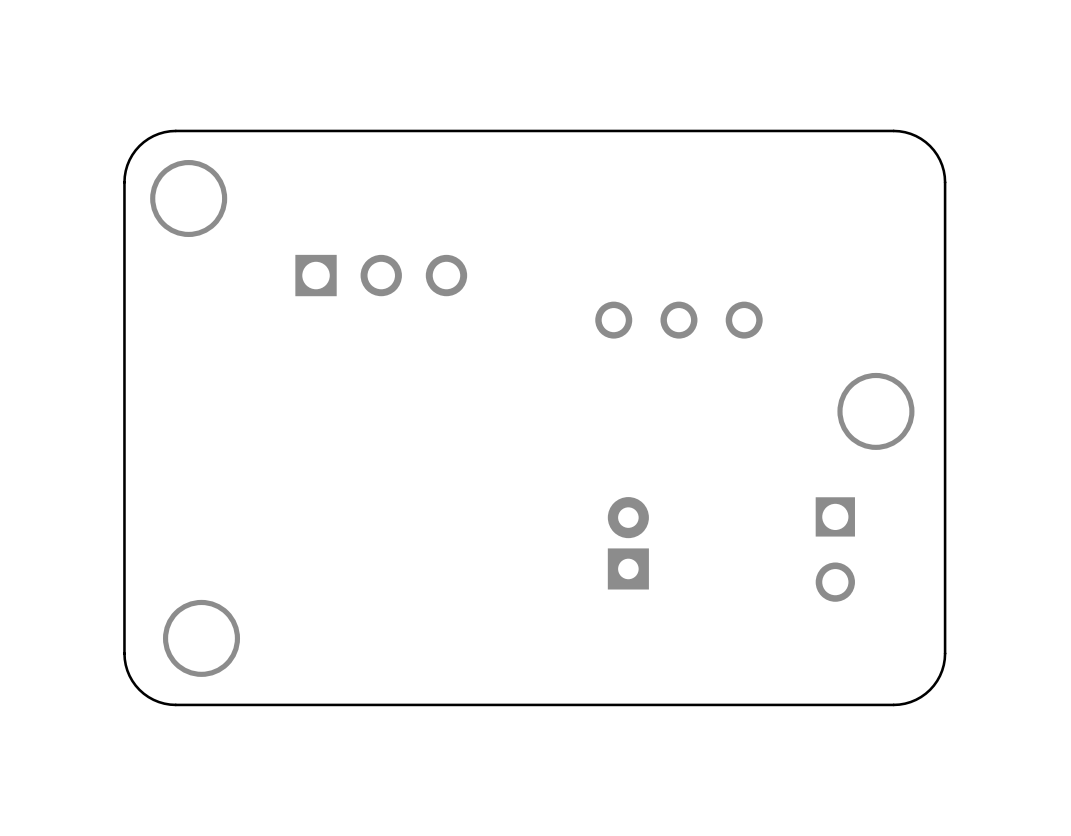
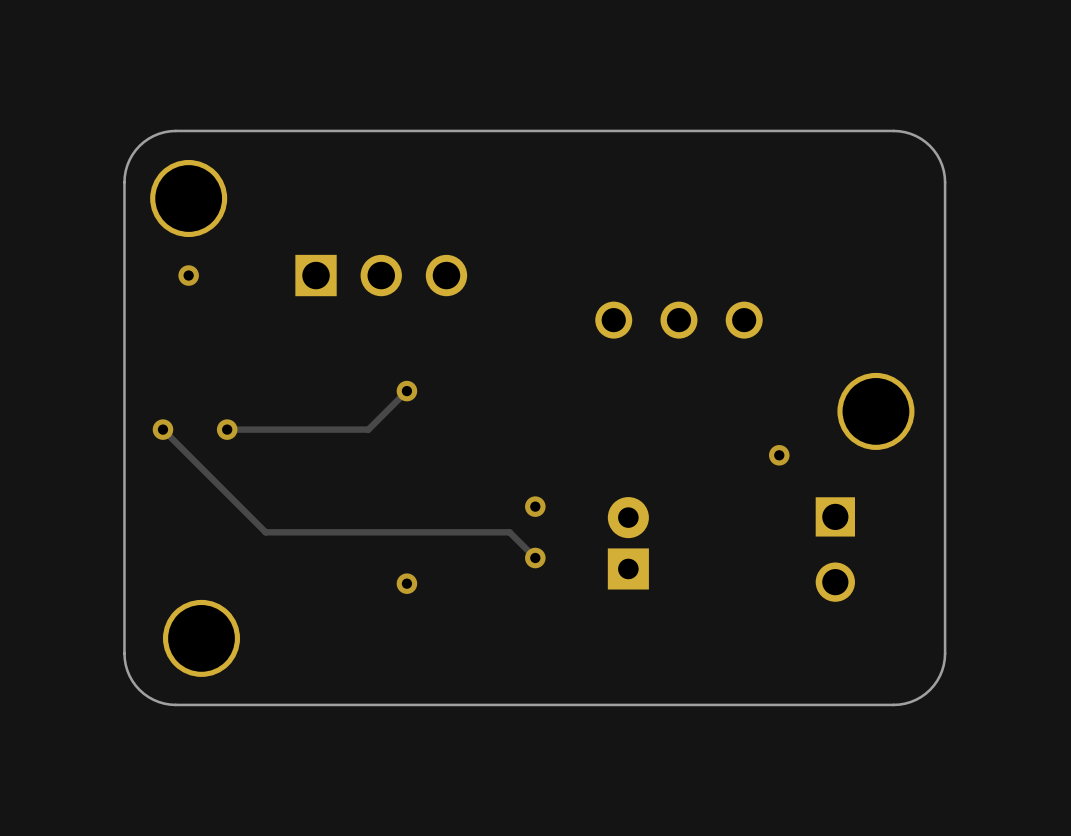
via: none -> (188, 275)
track: none -> (406, 391) (368, 429) (227, 429)
via: none -> (406, 391)
track: none -> (162, 429) (265, 532) (509, 532) (535, 558)
via: none -> (162, 429)
via: none -> (227, 429)
via: none -> (779, 455)
via: none -> (535, 506)
via: none -> (535, 558)
via: none -> (406, 583)

